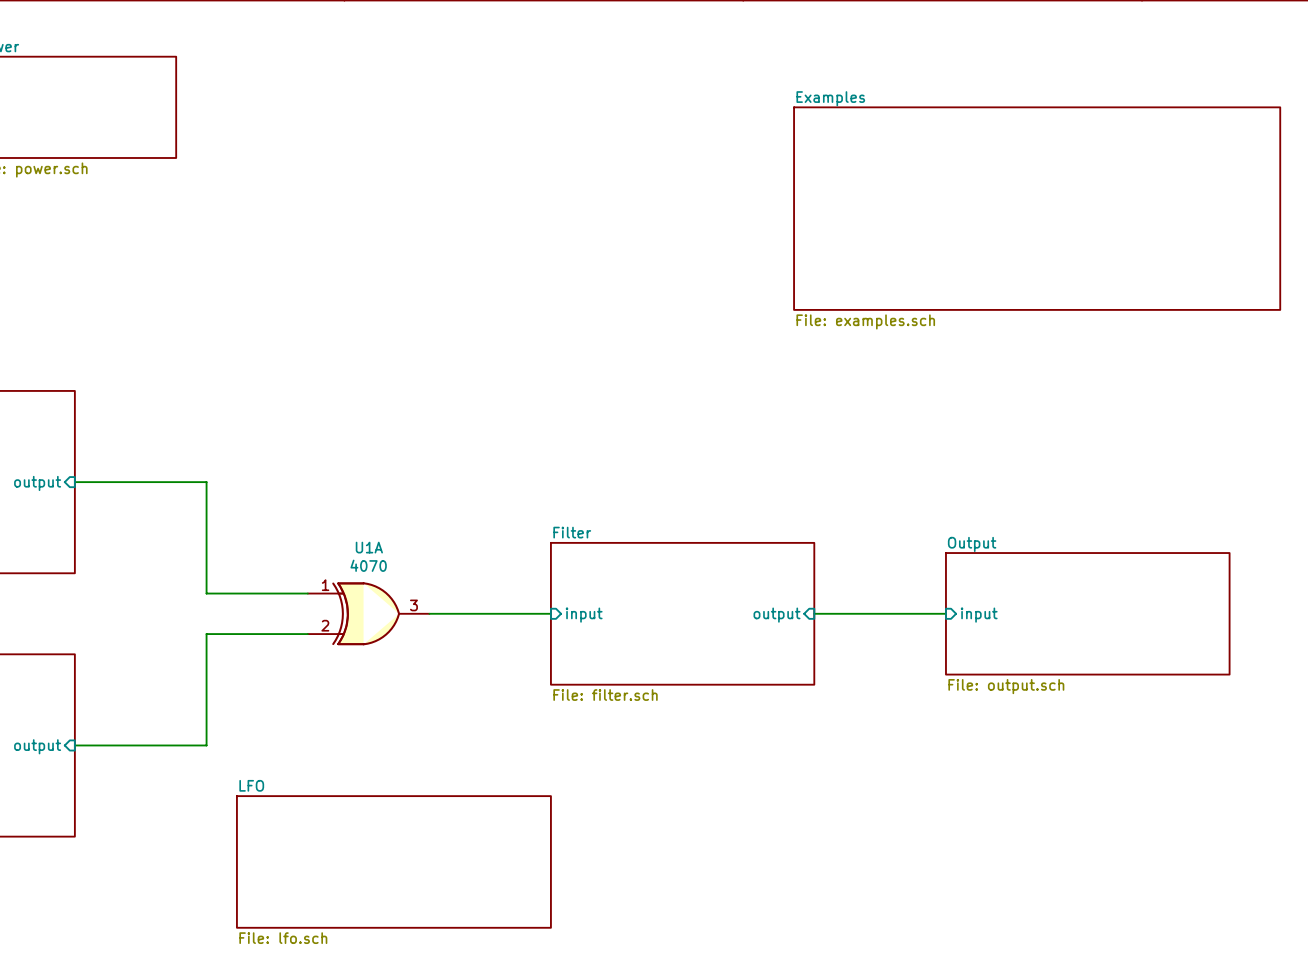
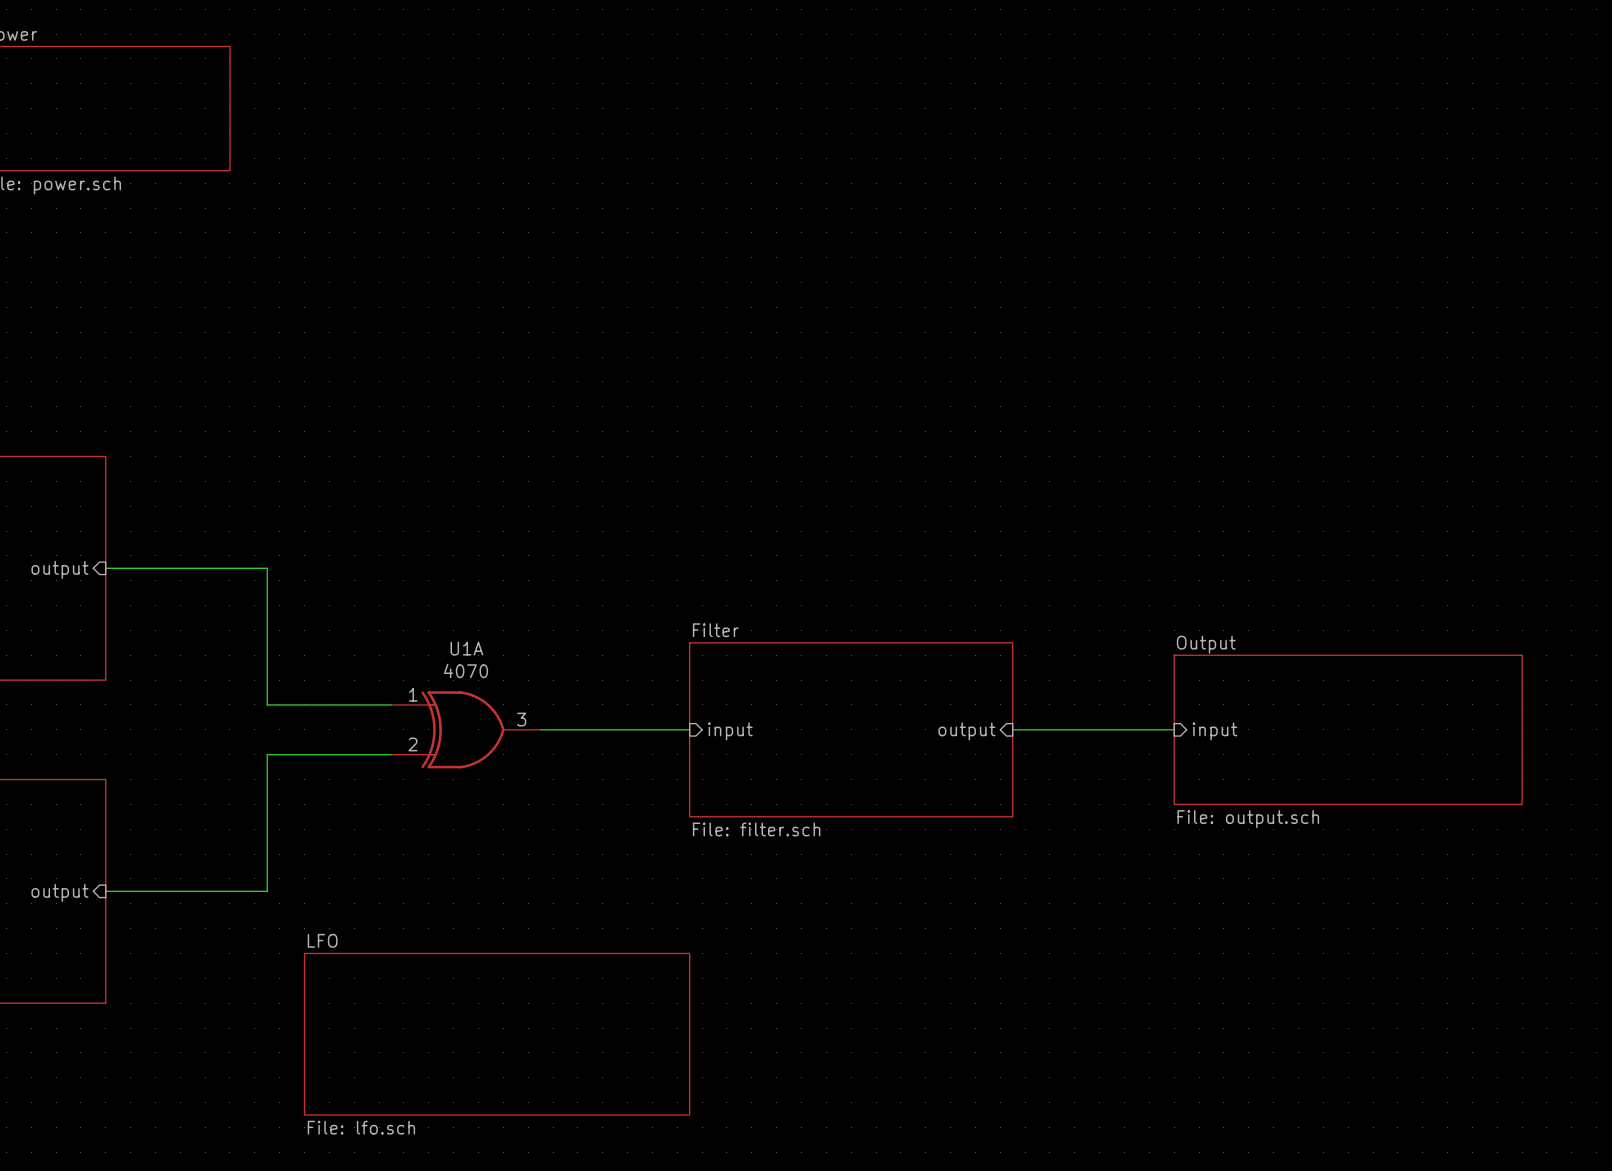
sheet Examples: File: examples.sch (1037, 208) -> none

